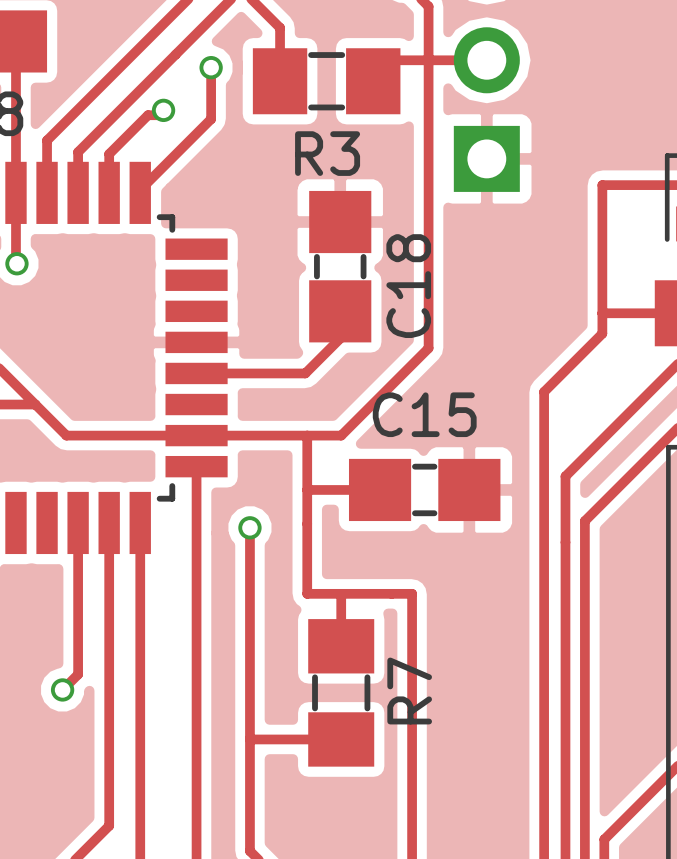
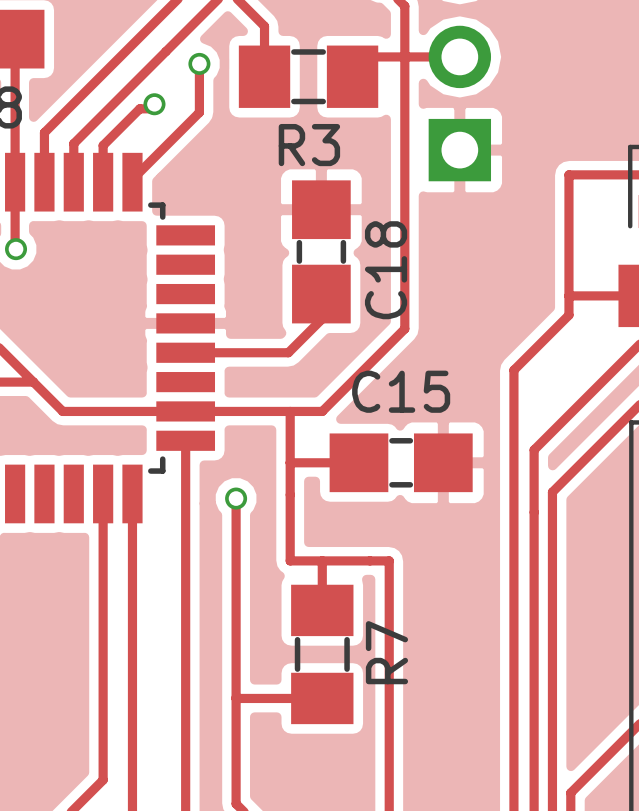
track: (78, 522) (78, 674) (62, 689) -> none
via: (62, 689) -> none

